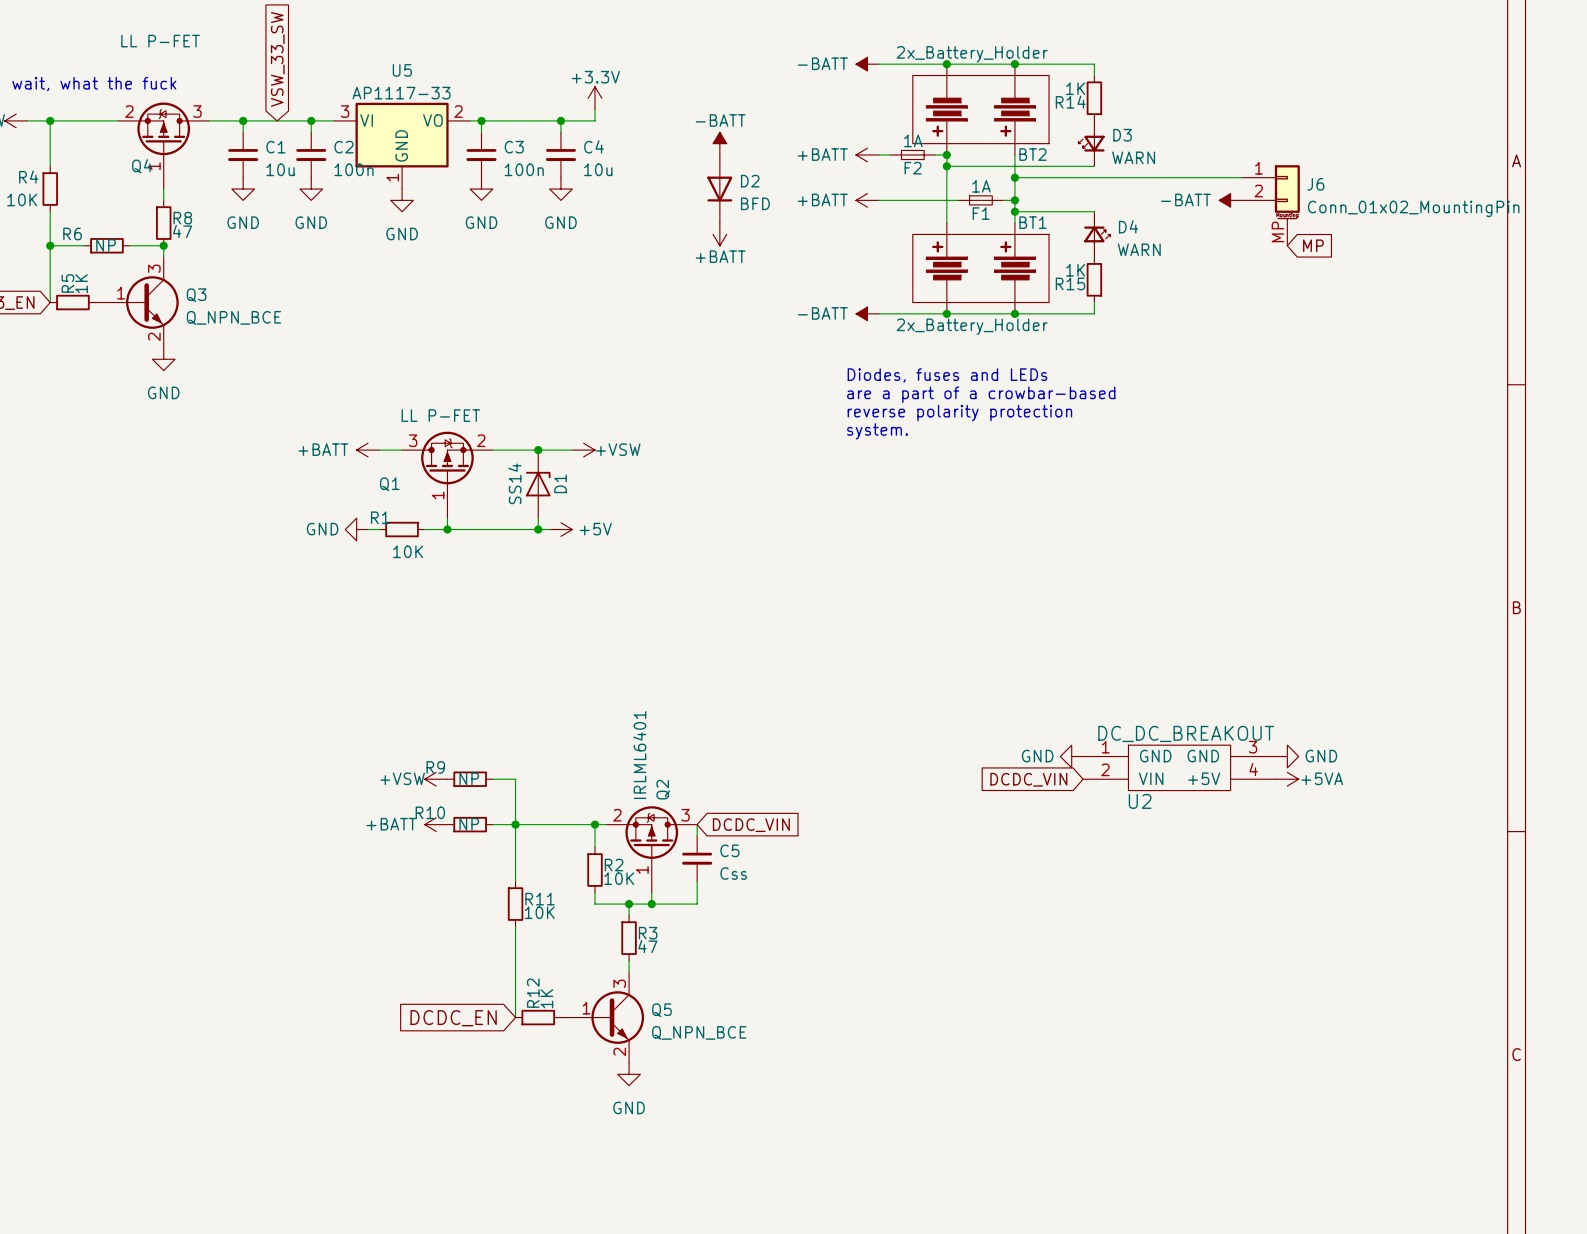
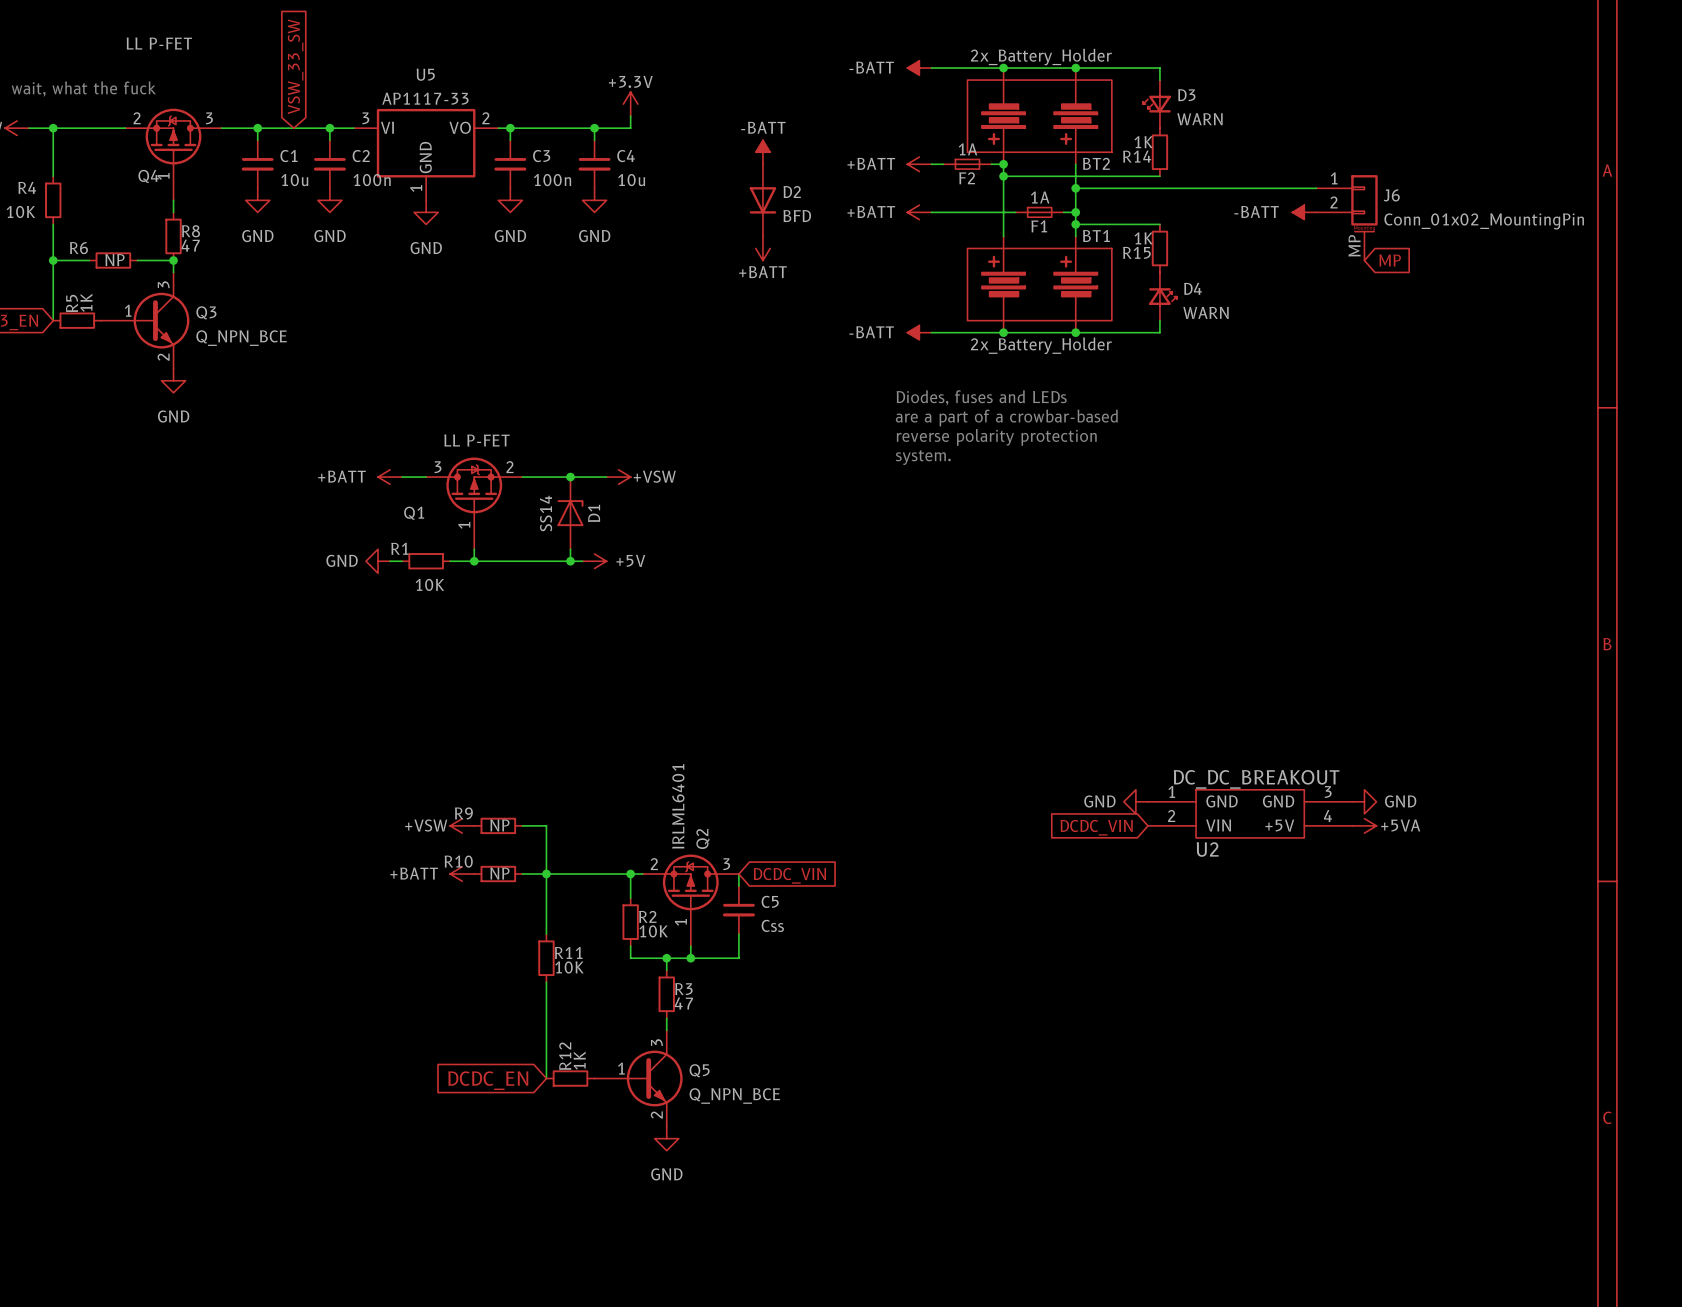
R14 position: (1094, 98) -> (1159, 152)
D3 position: (1091, 143) -> (1156, 104)
D4 position: (1097, 234) -> (1162, 296)
R15 position: (1094, 279) -> (1159, 248)

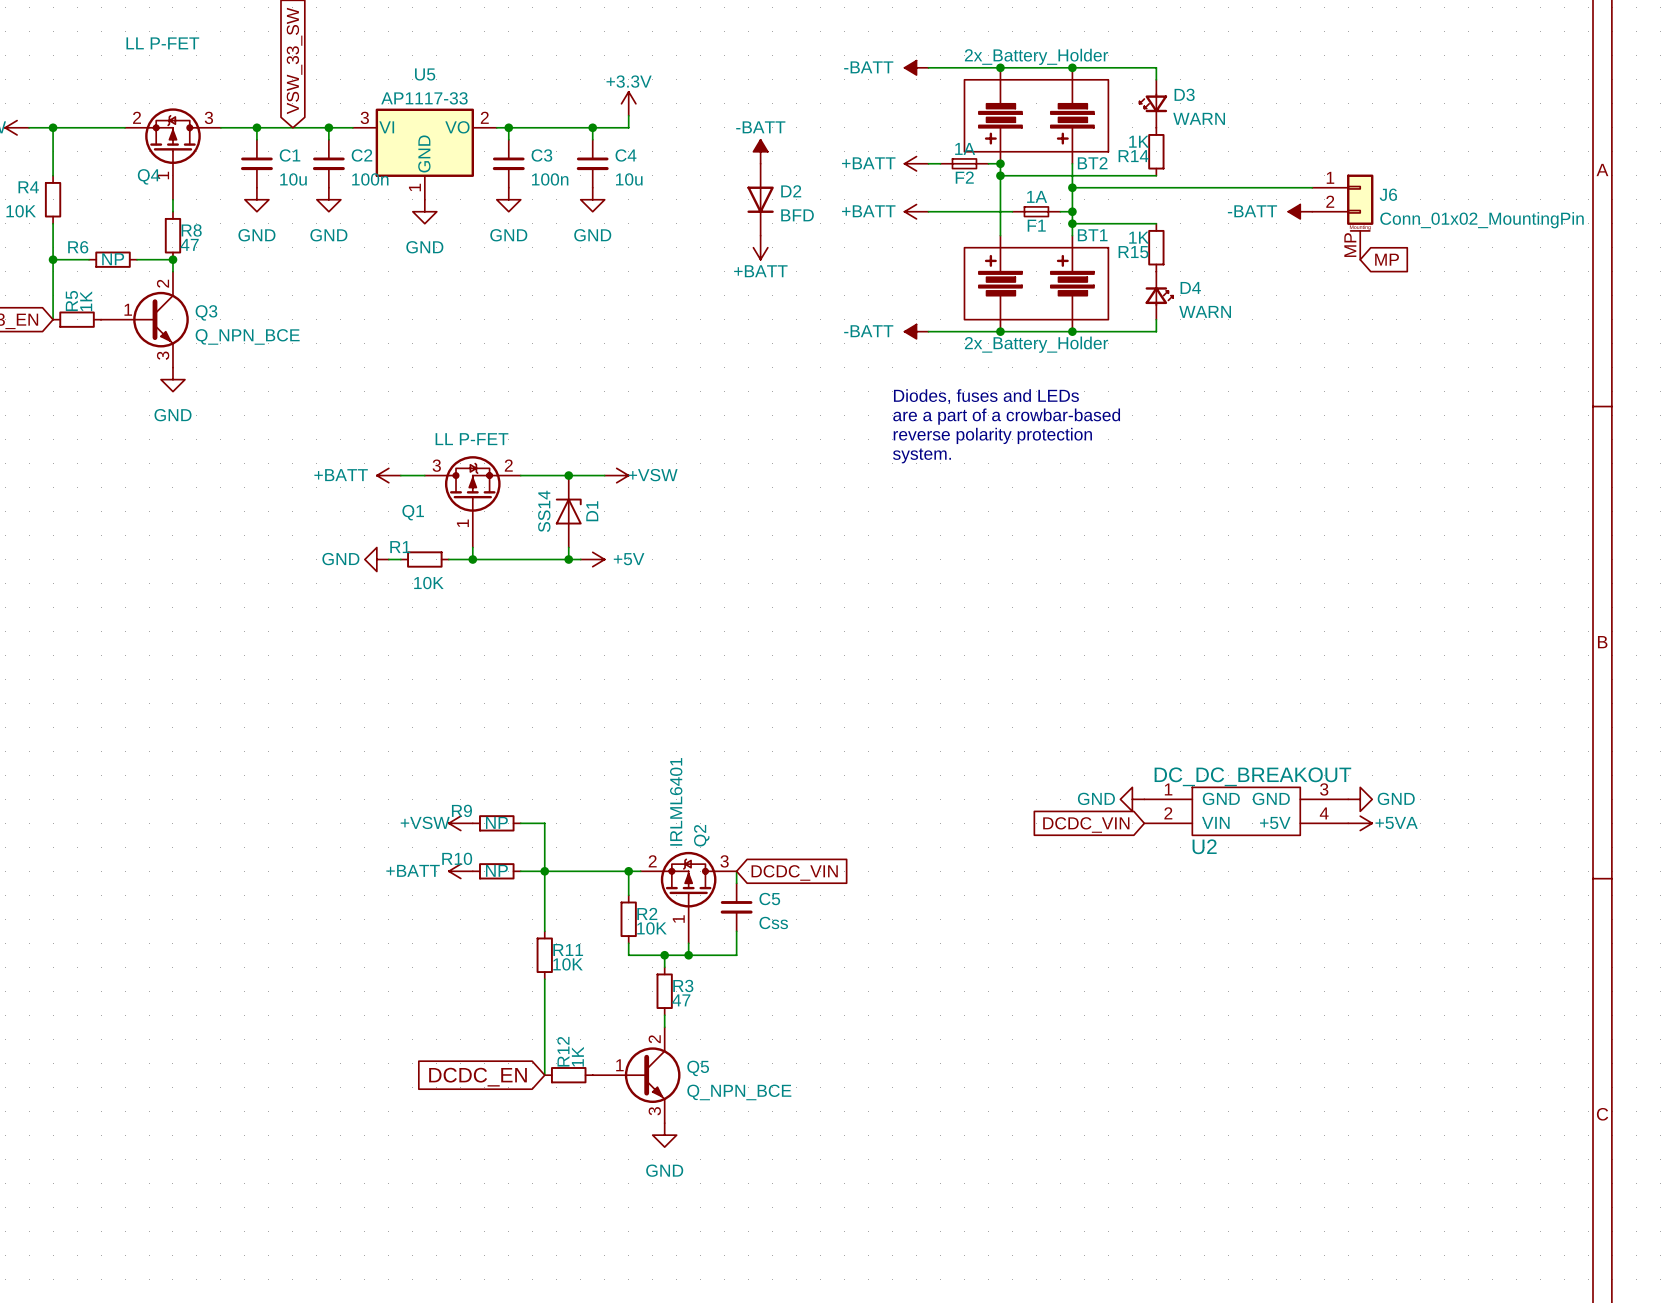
text: wait, what the fuck (83, 89) -> none
Q3 pin number: 3 (163, 284) -> 2 (163, 283)
Q3 pin number: 2 (163, 357) -> 3 (163, 355)
Q5 pin number: 3 (656, 1042) -> 2 (654, 1039)
Q5 pin number: 2 (656, 1114) -> 3 (654, 1111)

